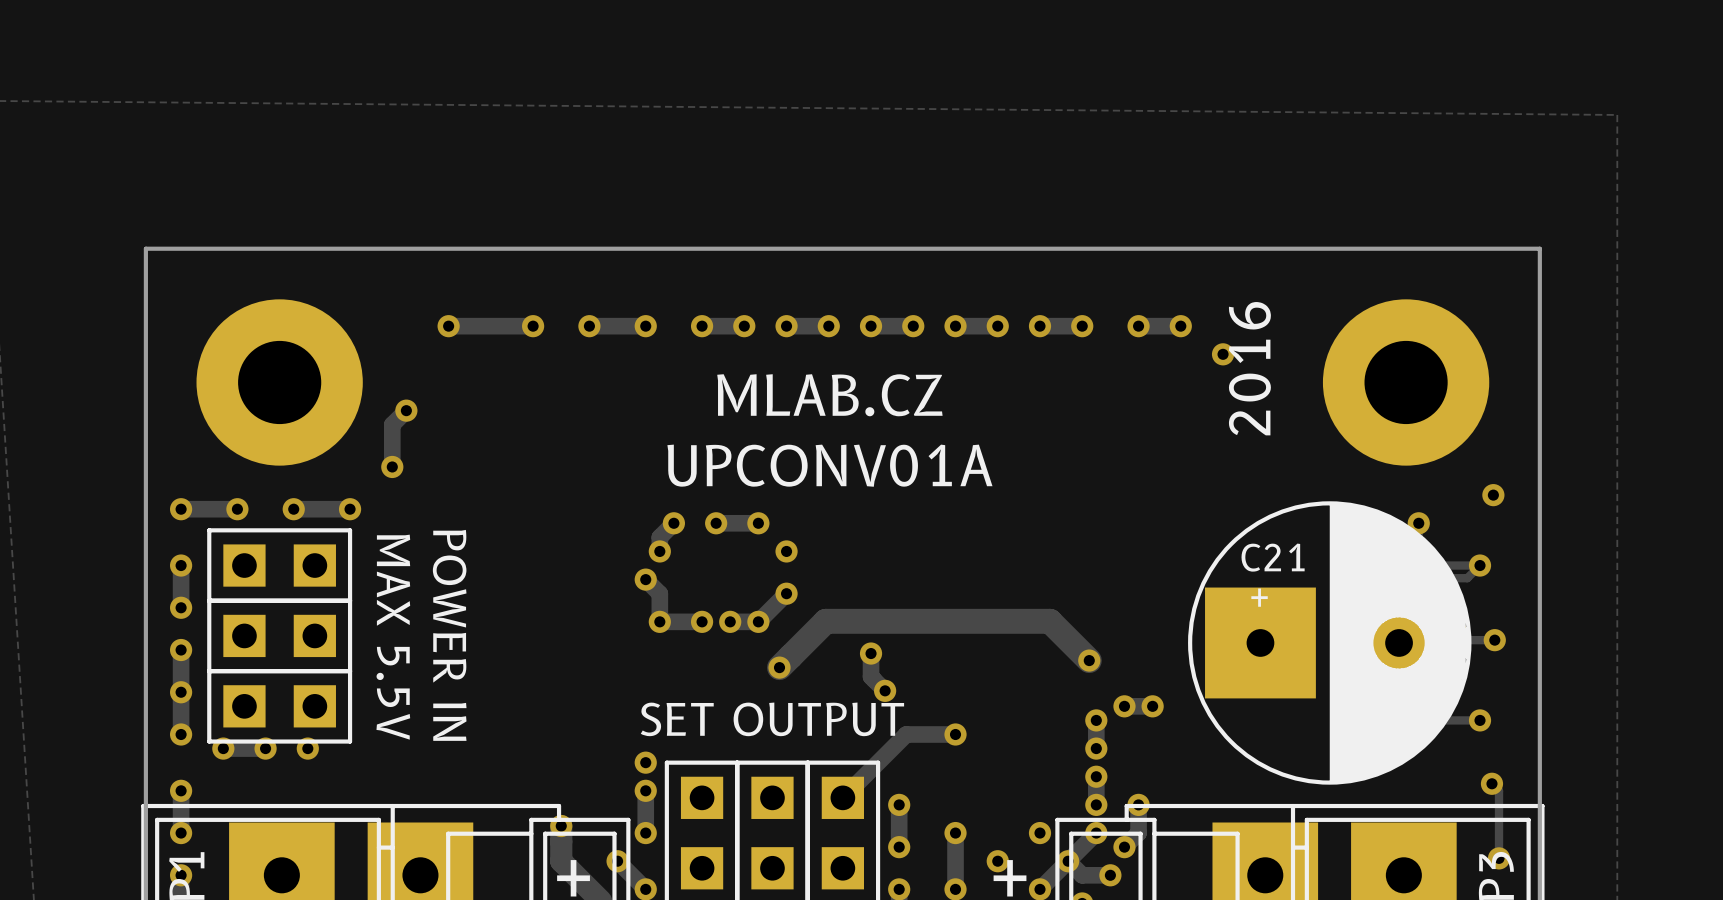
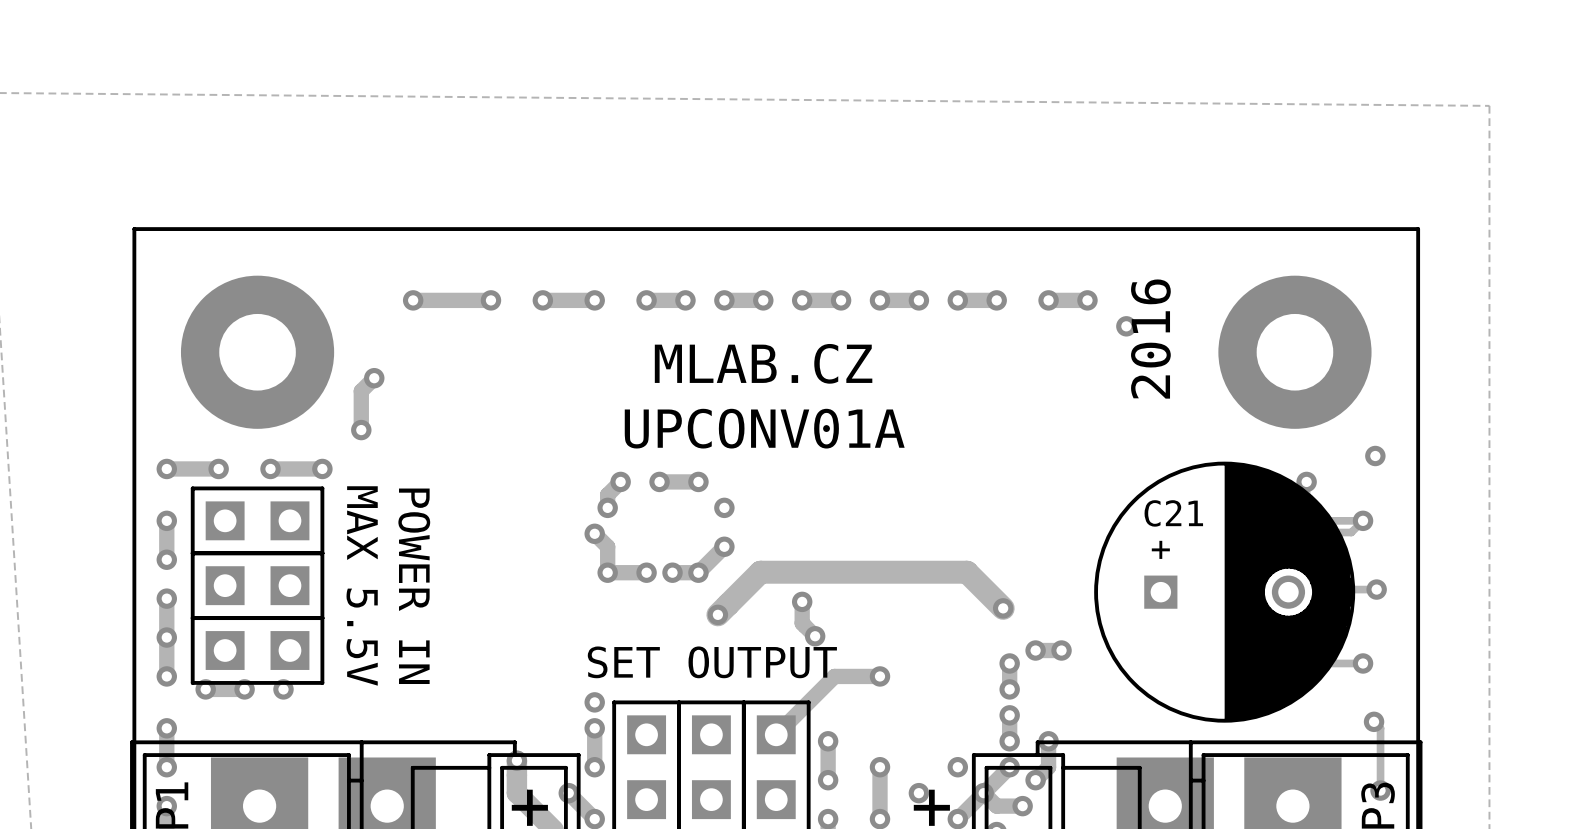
C21 footprint: [1188, 501, 1472, 785] -> [1094, 461, 1356, 723]

